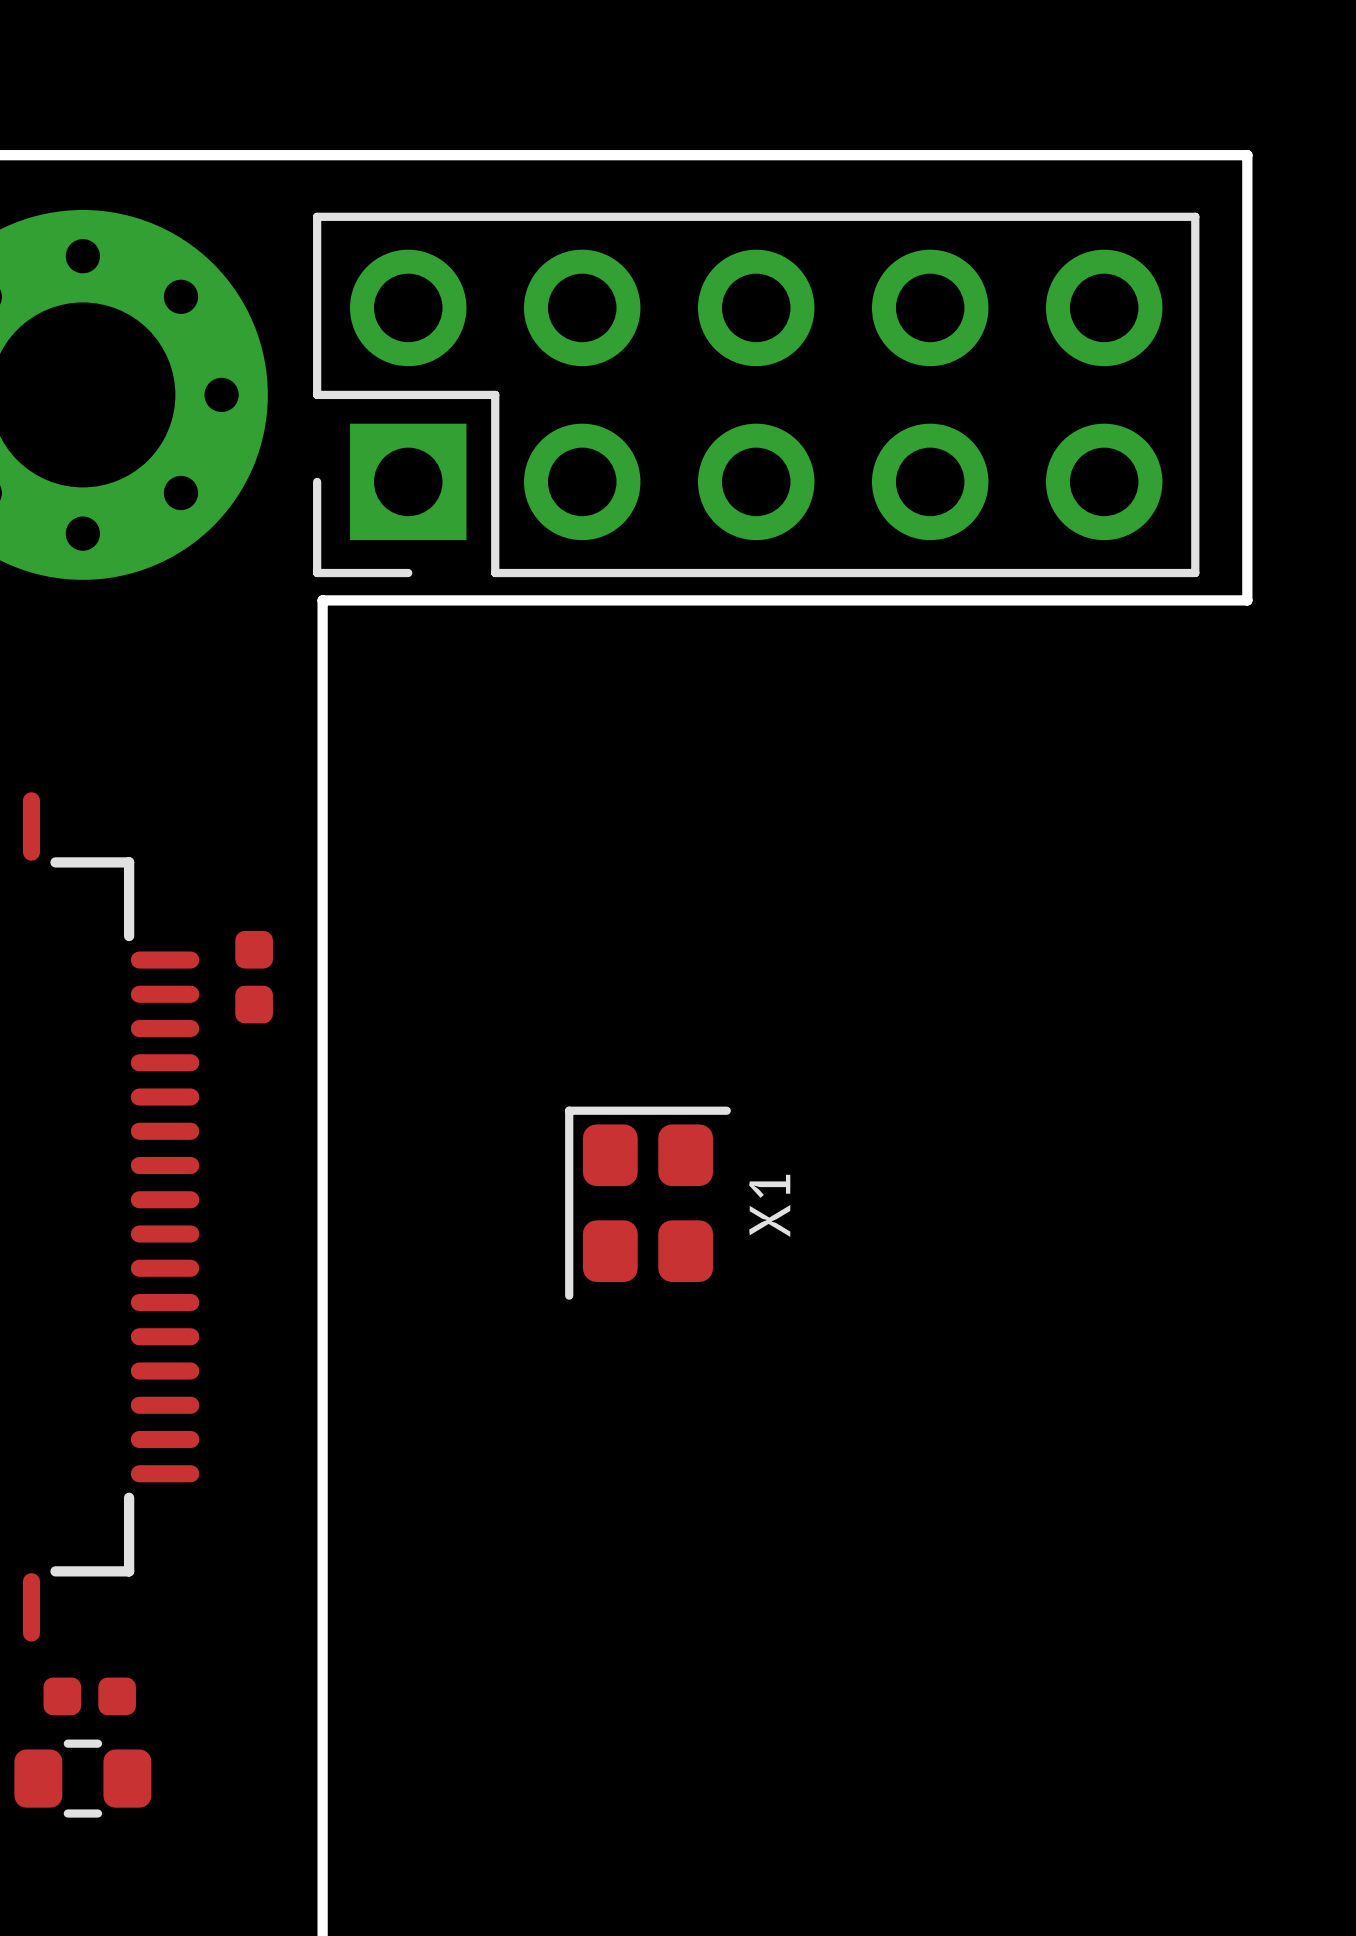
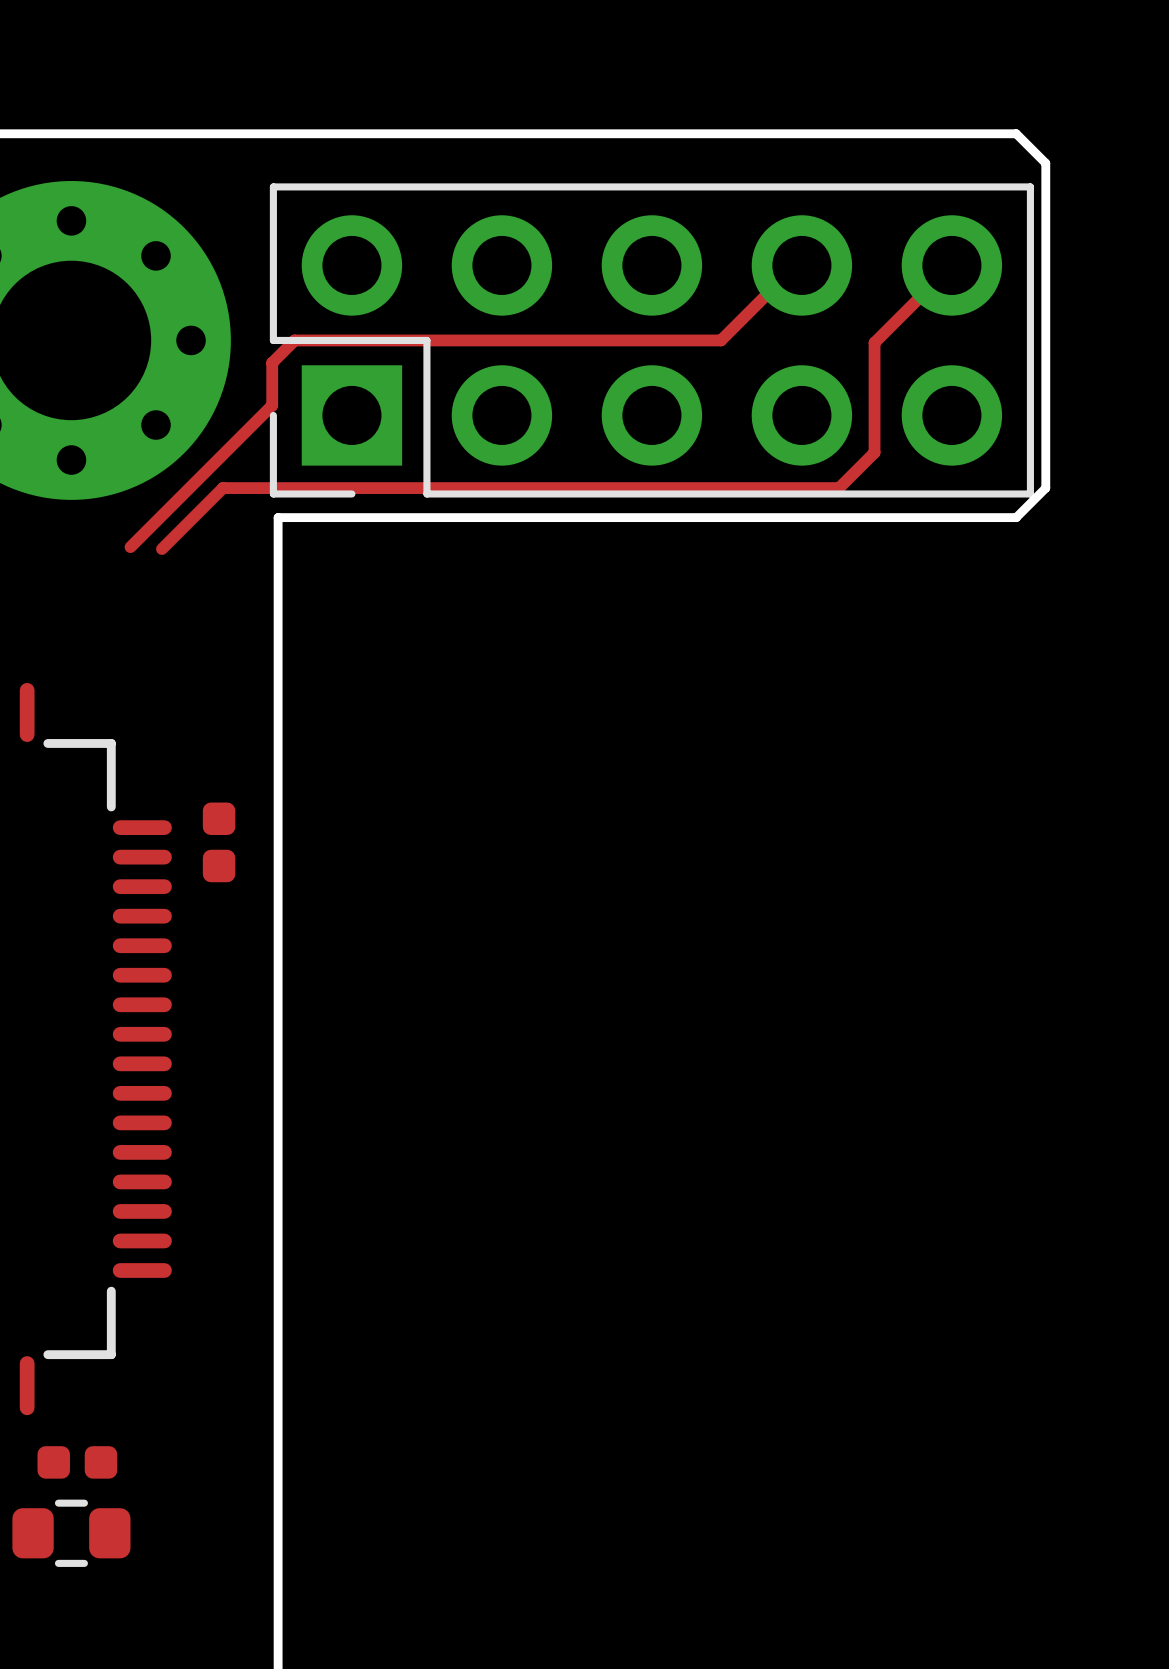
board edge: (1178, 155) (1247, 155) (1247, 600) (1178, 600) -> (1016, 133) (1045, 163) (1045, 488) (1016, 517)
track: none -> (801, 265) (796, 265) (721, 340) (294, 340) (272, 362) (272, 405) (130, 547)
track: none -> (951, 265) (874, 342) (874, 452) (839, 488) (222, 488) (161, 549)
X1: (647, 1203) -> none

